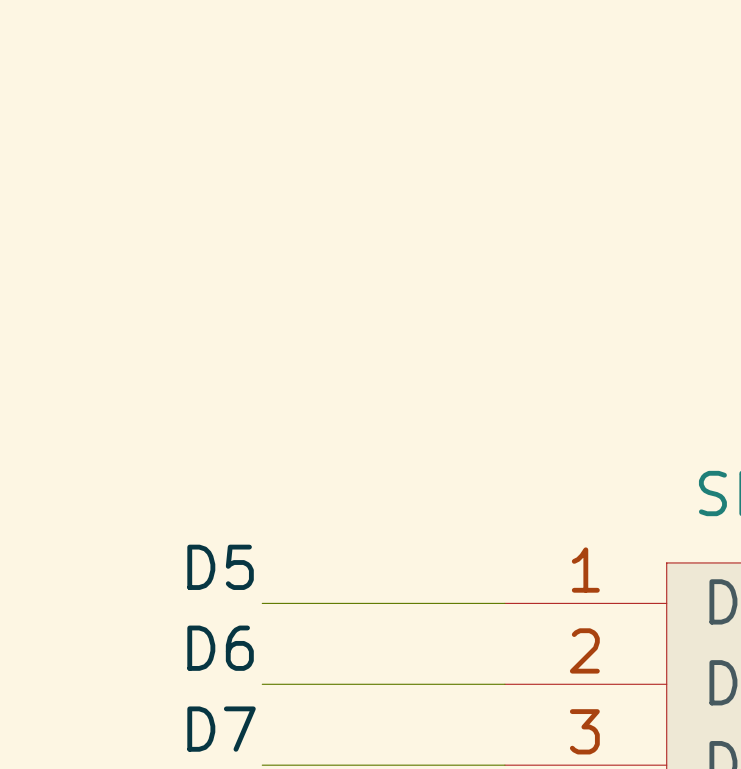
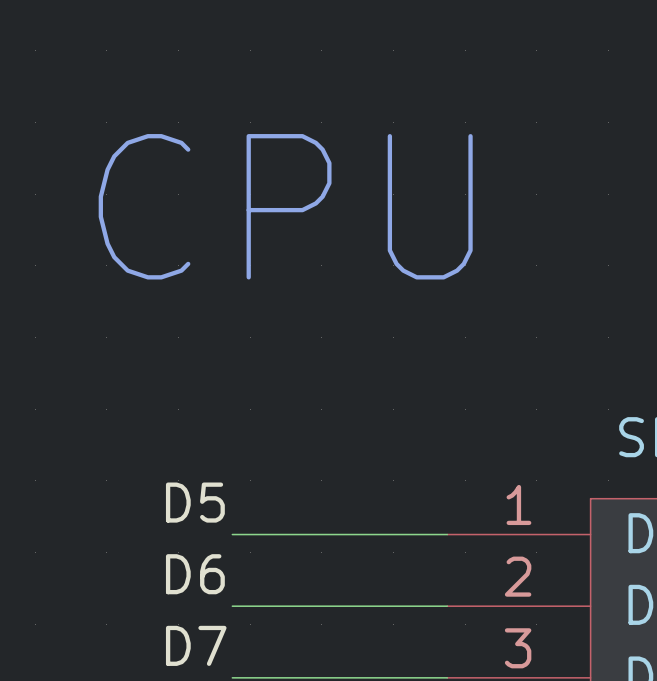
text: none -> CPU (285, 206)

